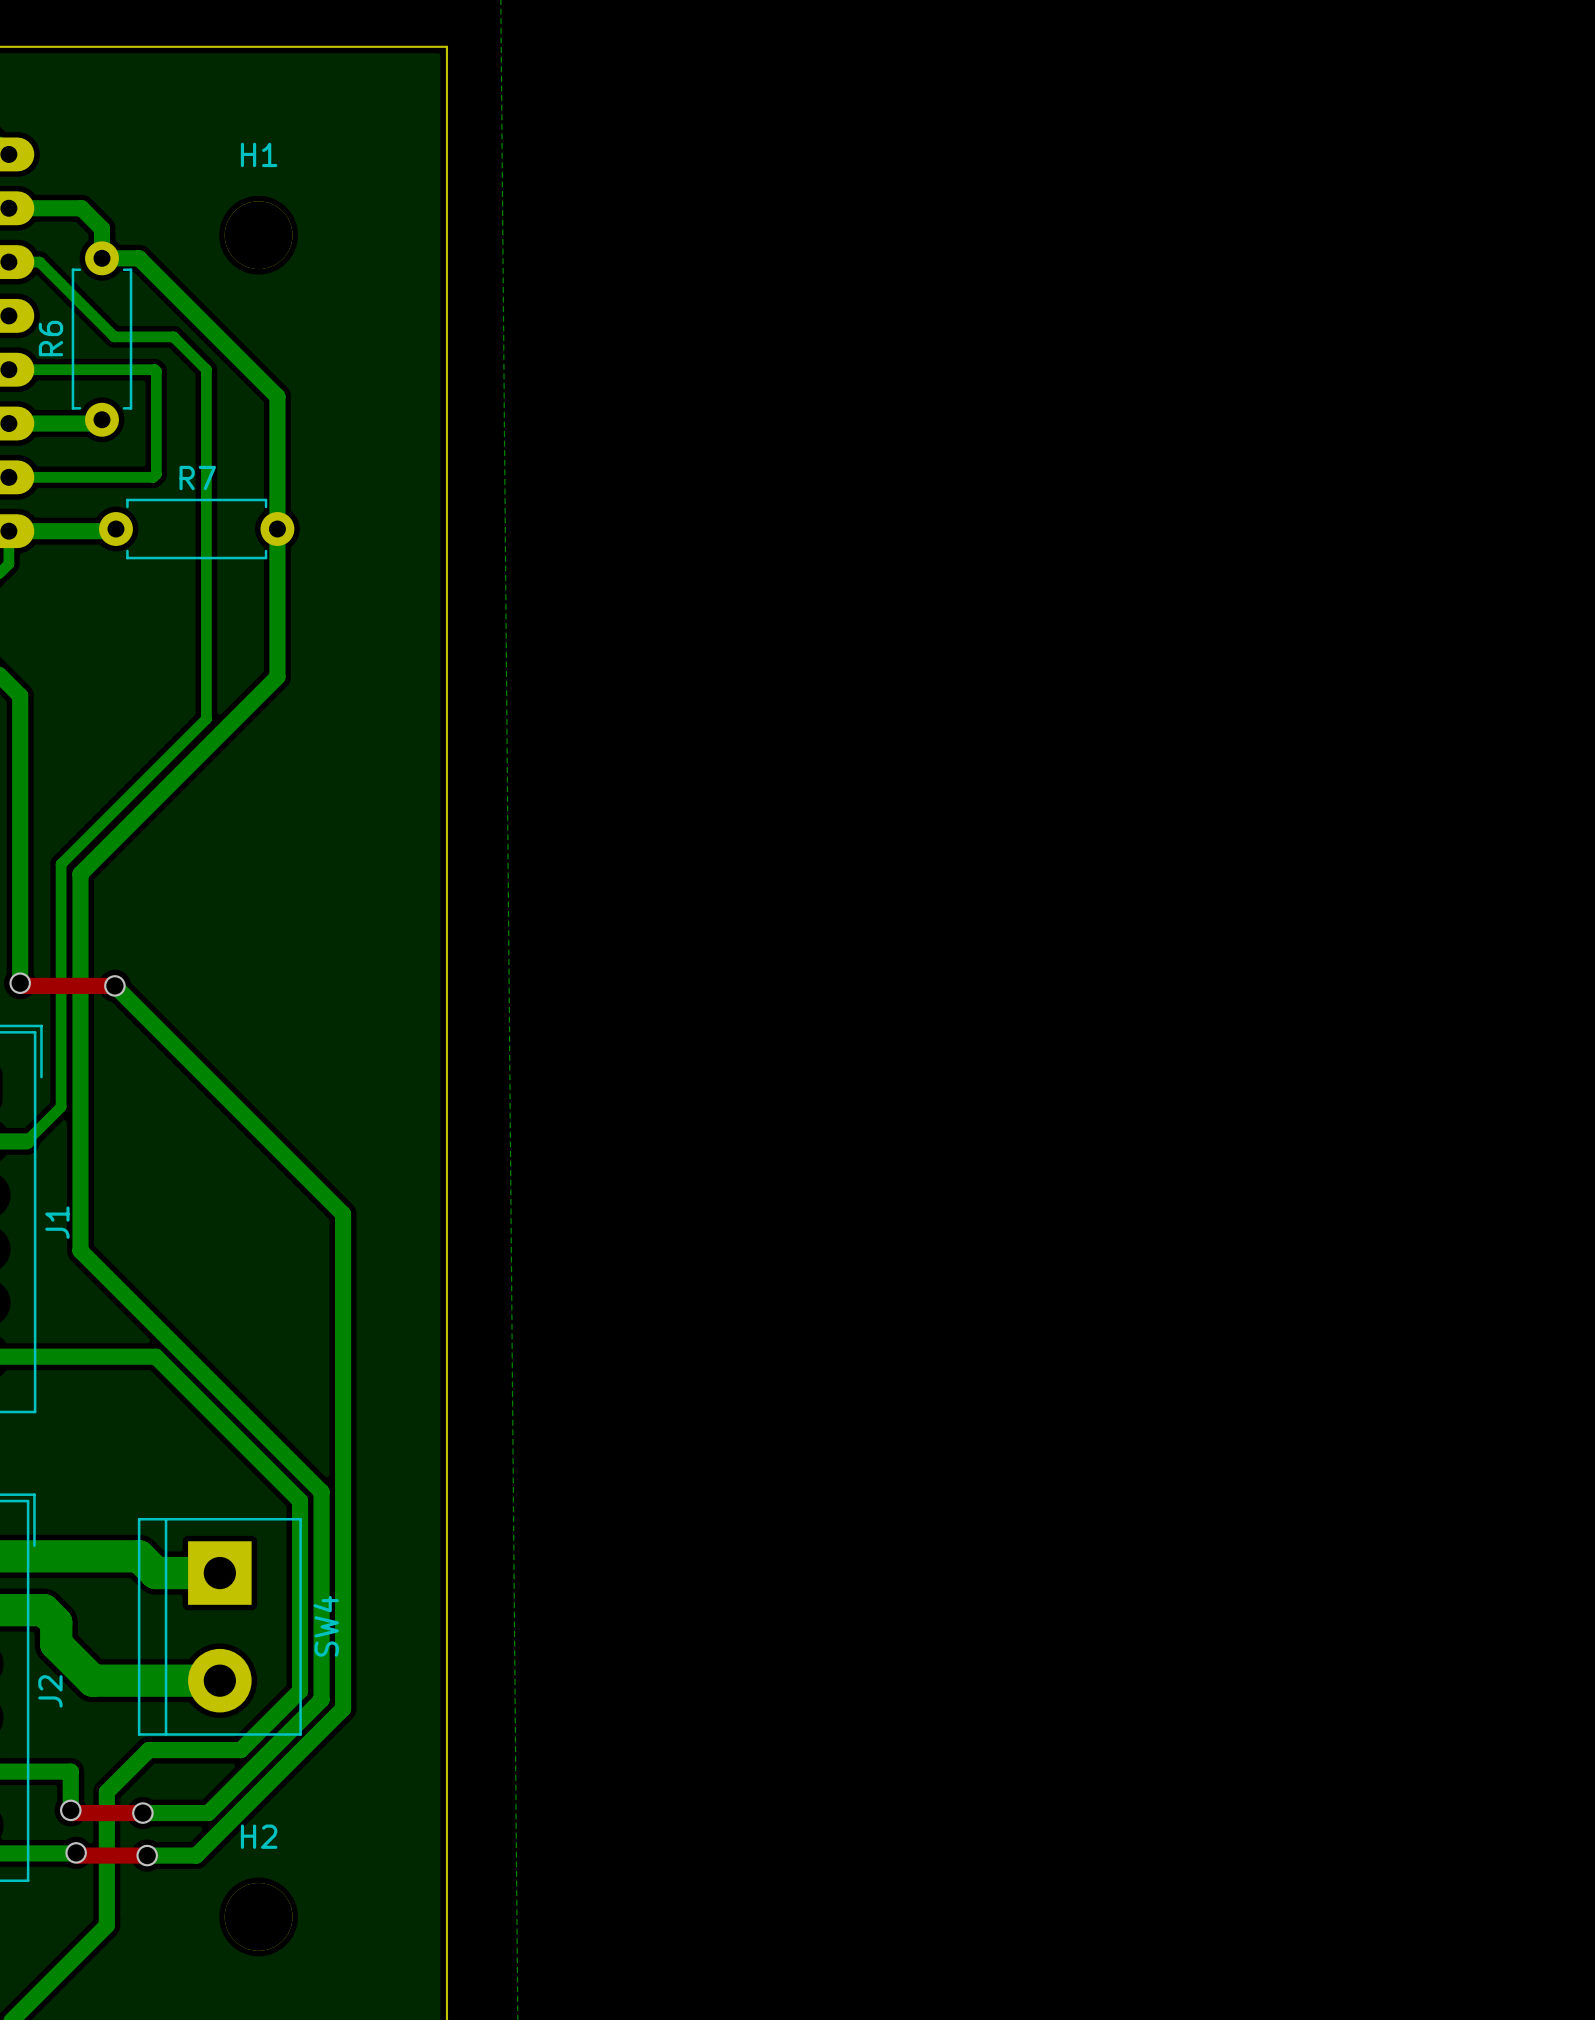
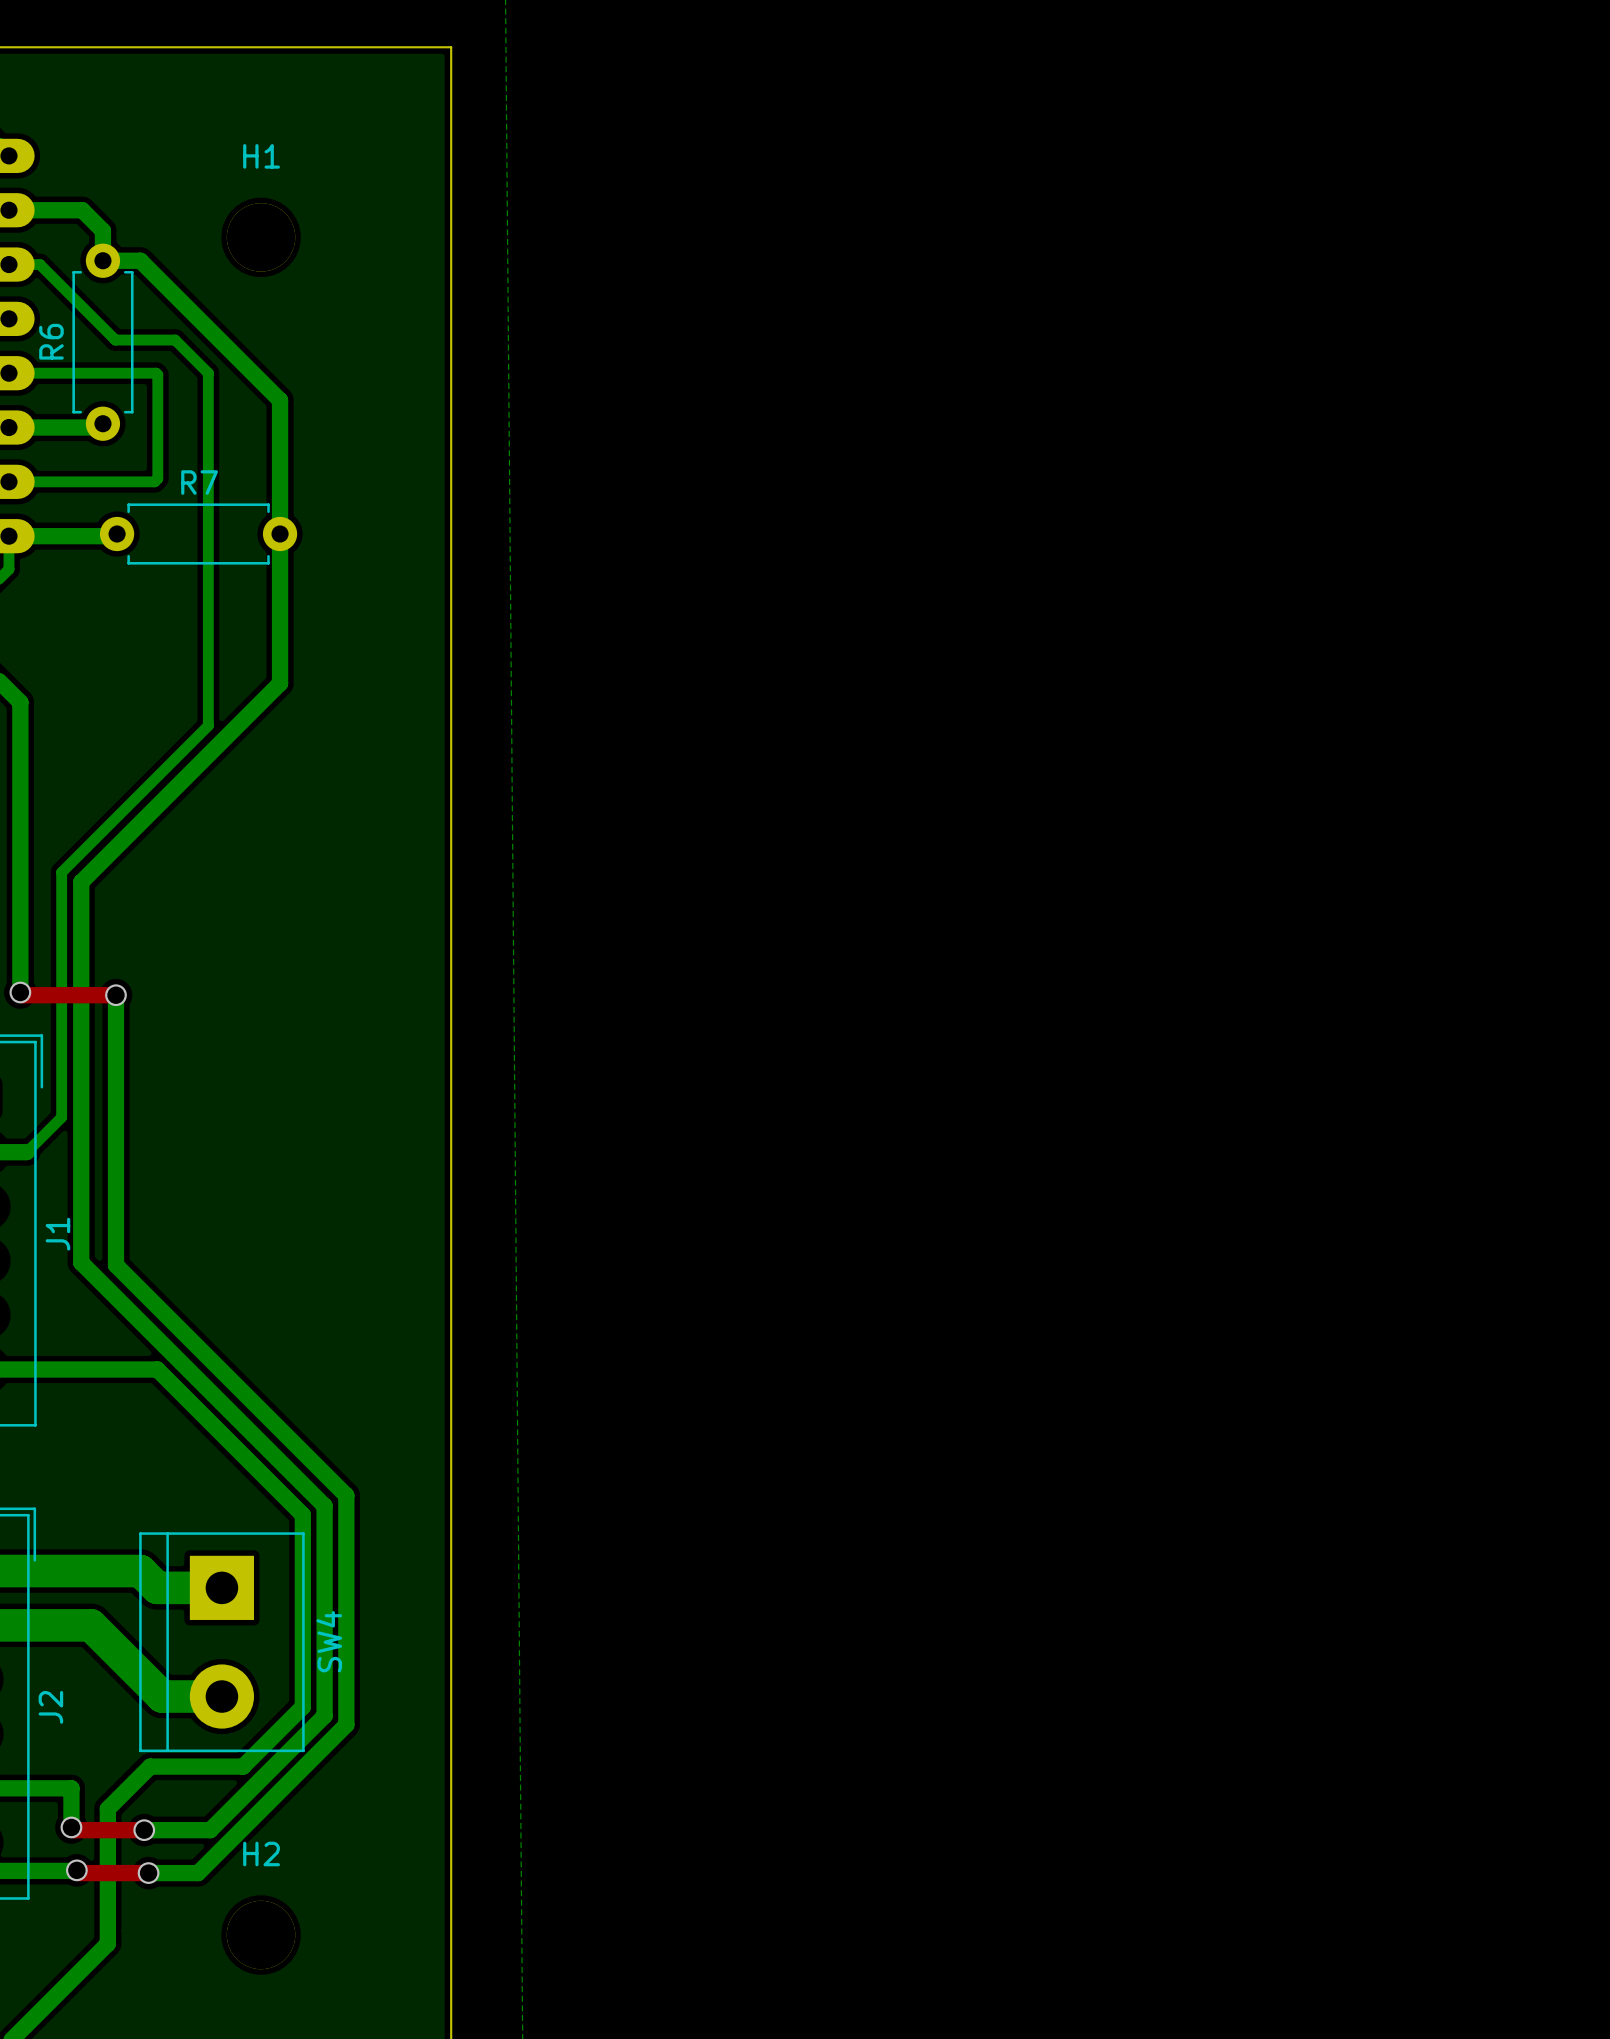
bottom track: (114, 985) (343, 1214) (343, 1481) -> (115, 995) (115, 1265) (346, 1495)
bottom track: (43, 1610) (56, 1622) (56, 1644) (92, 1680) (160, 1680) -> (44, 1625) (91, 1625) (162, 1696)

